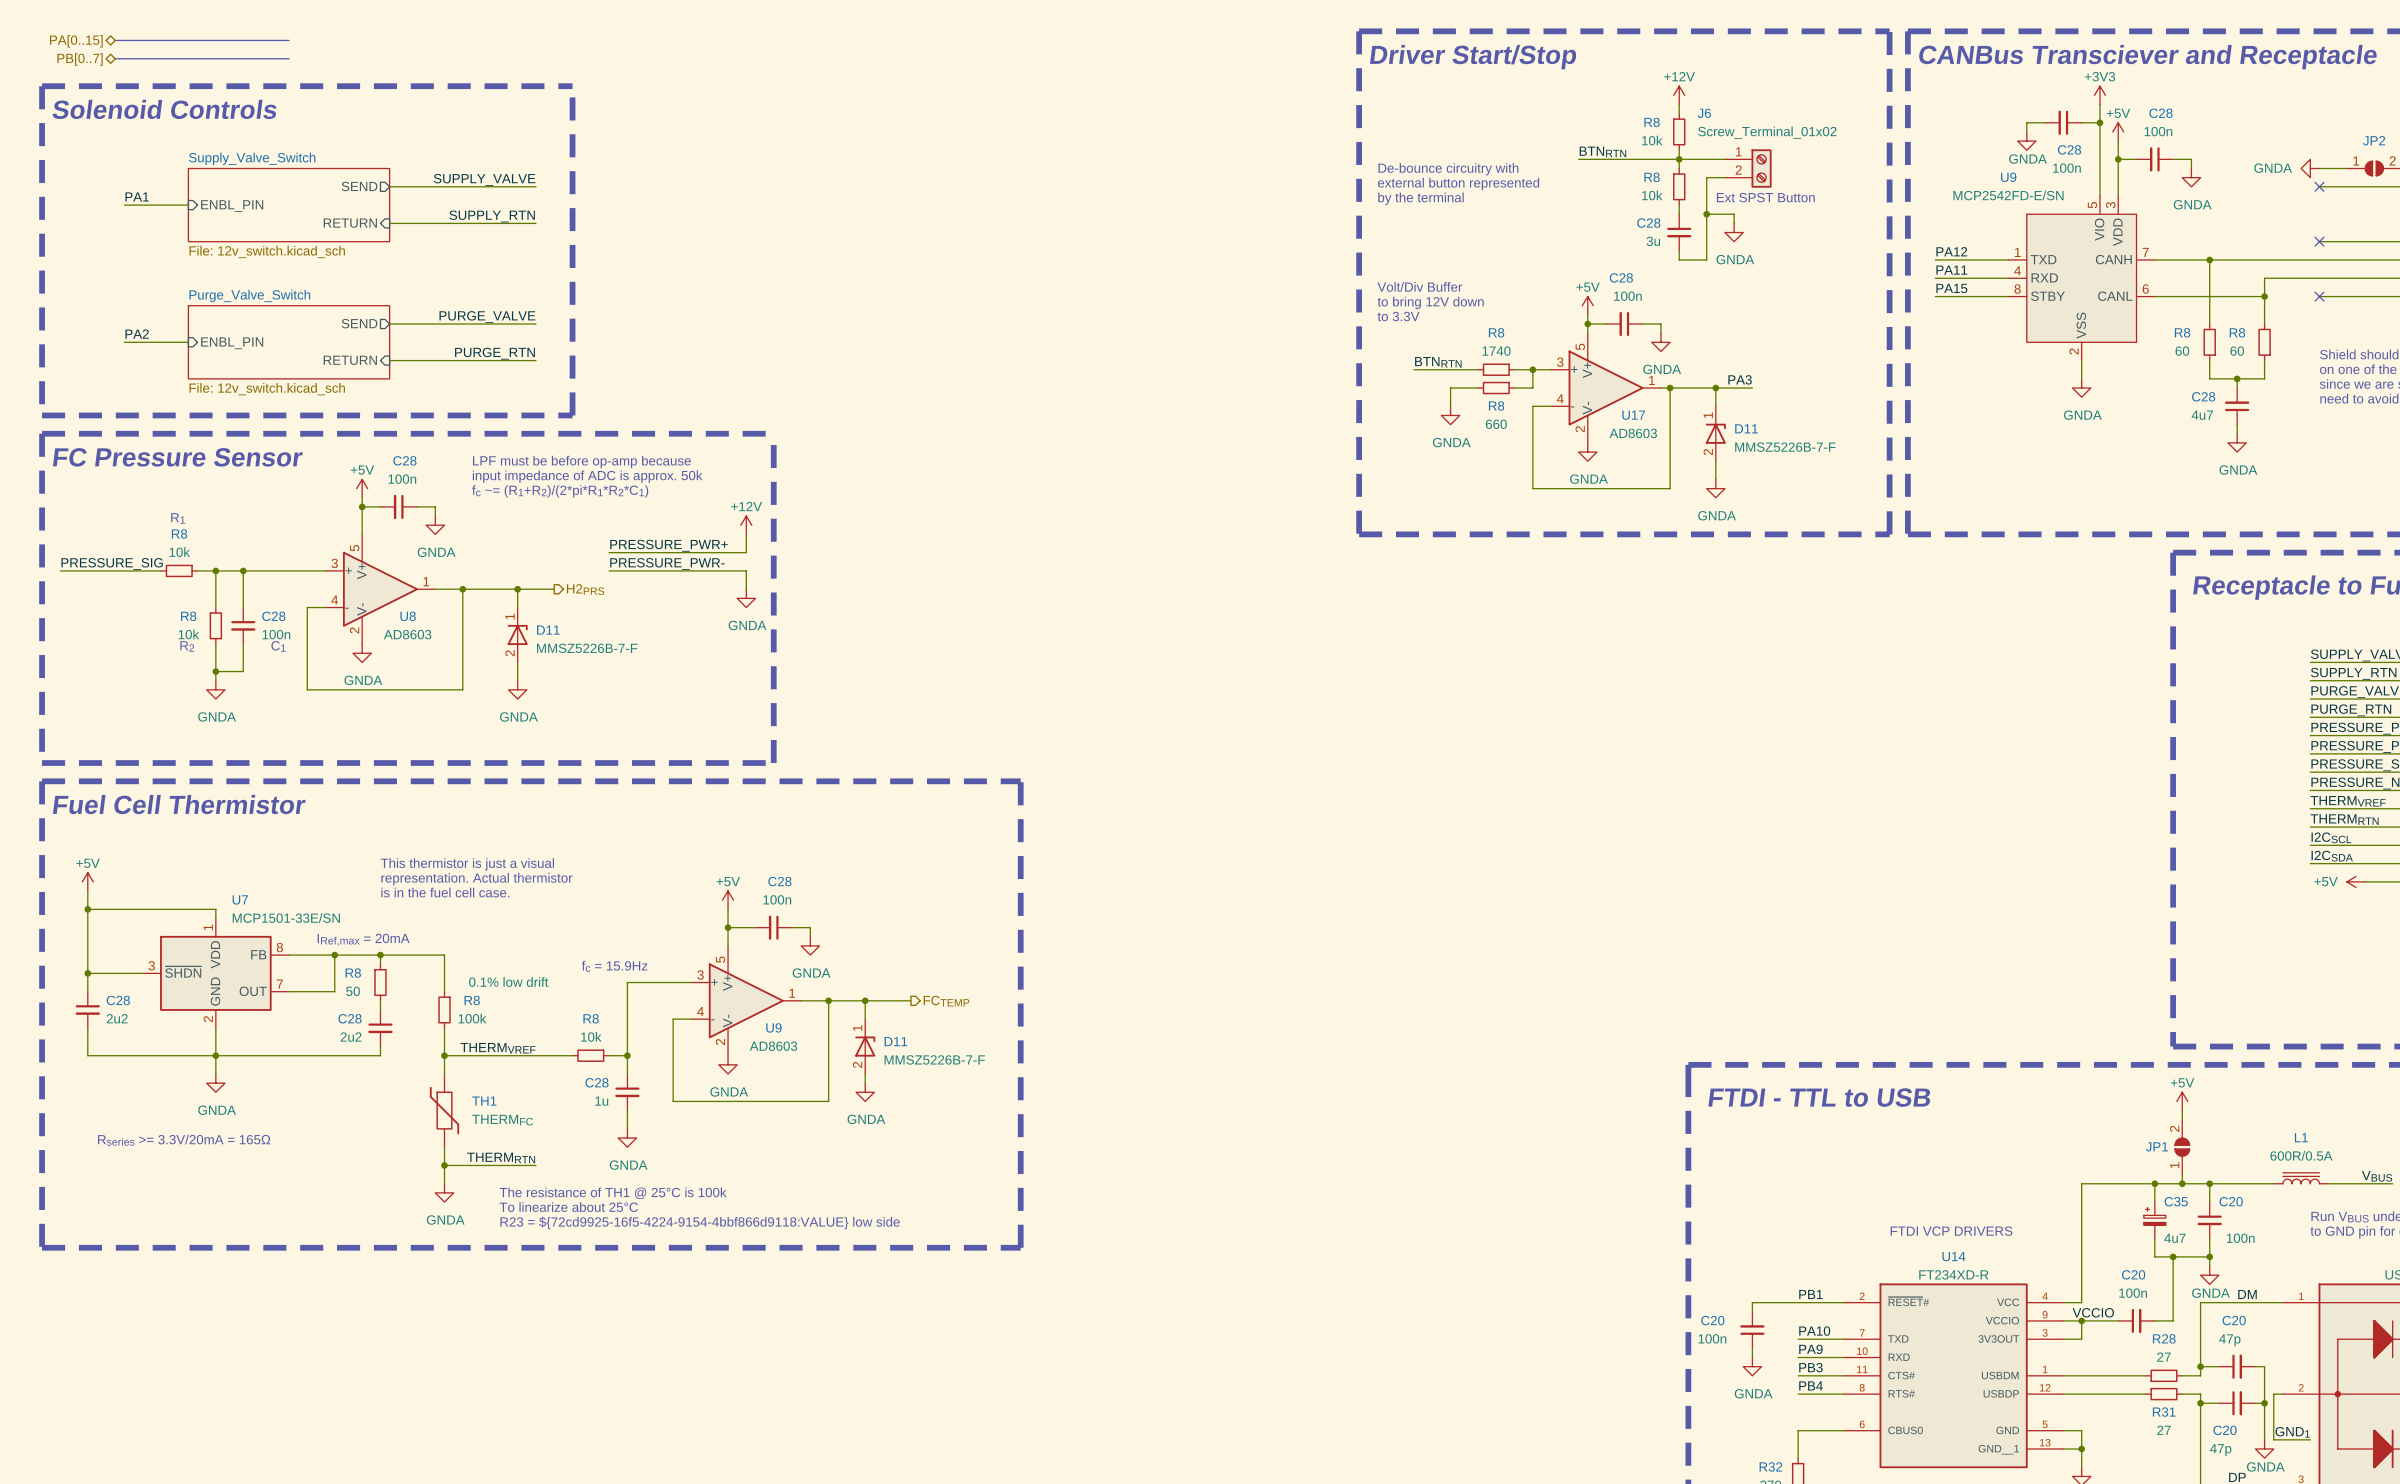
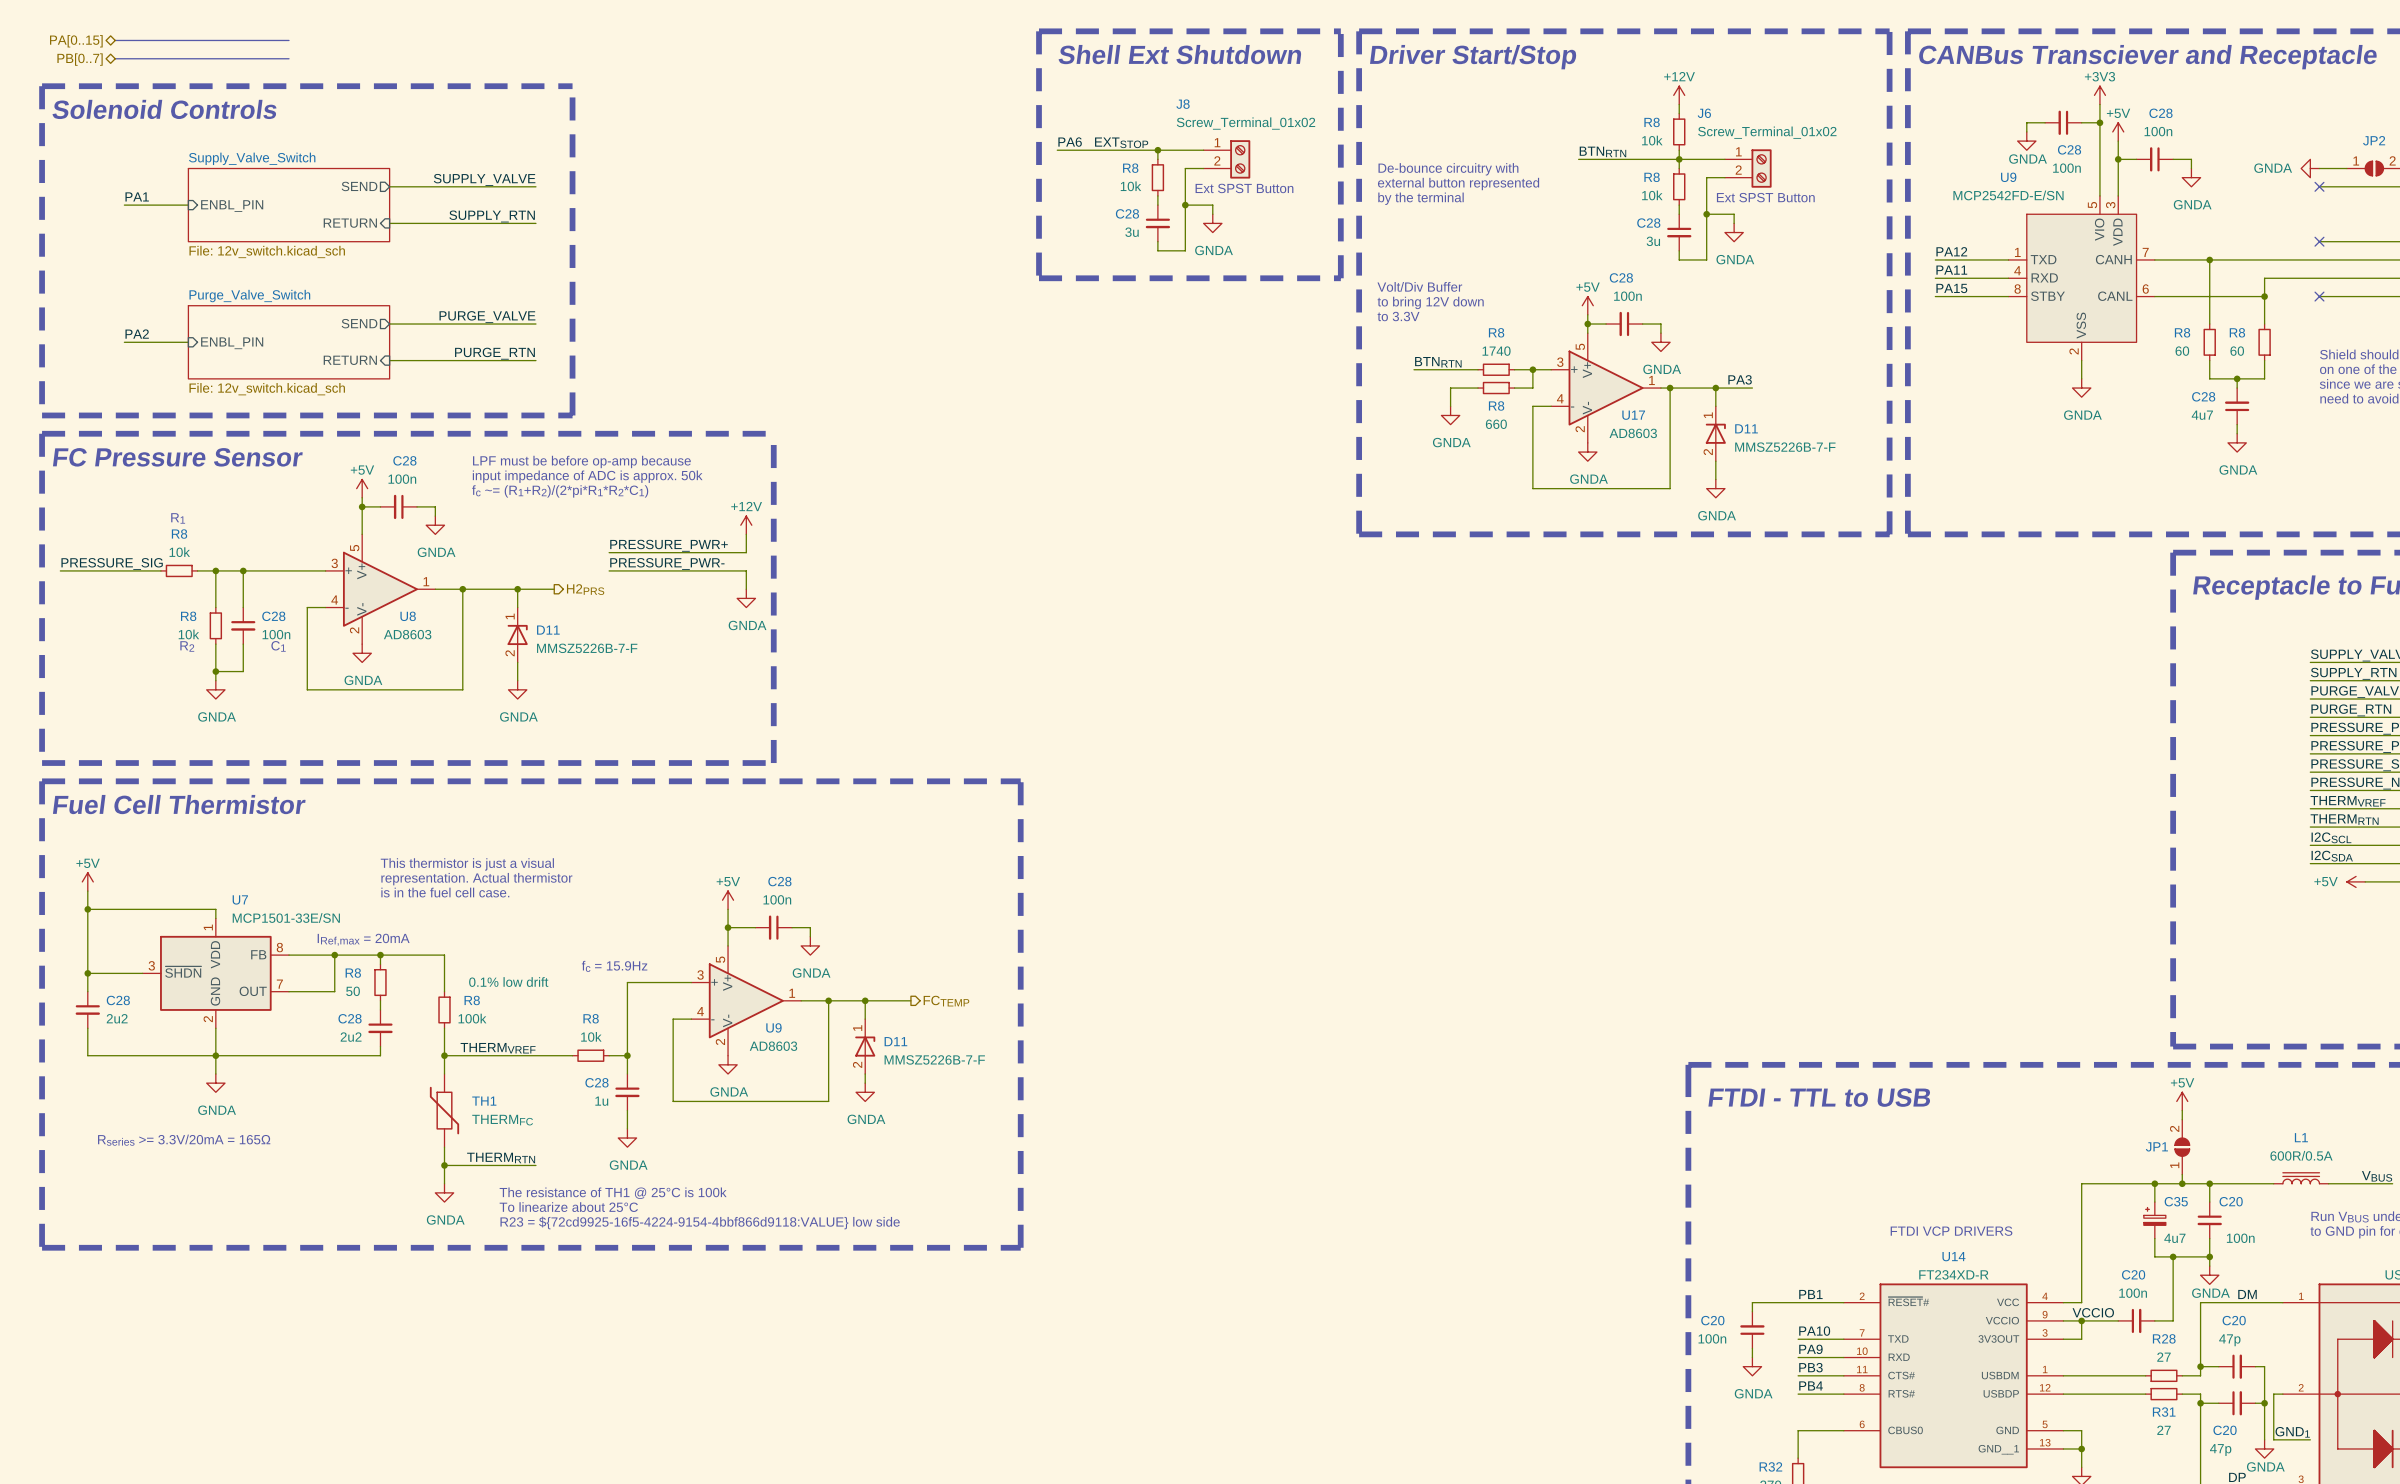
line: none -> (1039, 31) (1340, 31) (1340, 278) (1039, 278) (1039, 31)
text: none -> Shell Ext Shutdown (1179, 54)
label: none -> PA6 (1070, 142)
label: none -> EXTSTOP (1121, 142)
wire: none -> (1057, 150) (1203, 150)
wire: none -> (1157, 150) (1157, 159)
junction: none -> (1157, 150)
J8: none -> Screw_Terminal_01x02 (1226, 159)
wire: none -> (1203, 168) (1185, 168) (1185, 250) (1157, 250) (1157, 241)
R8: none -> 10k (1157, 177)
text: none -> Ext SPST Button (1244, 188)
wire: none -> (1157, 195) (1157, 205)
wire: none -> (1185, 205) (1212, 205) (1212, 214)
junction: none -> (1185, 205)
C28: none -> 3u (1157, 223)
power symbol: none -> GNDA (1212, 223)

